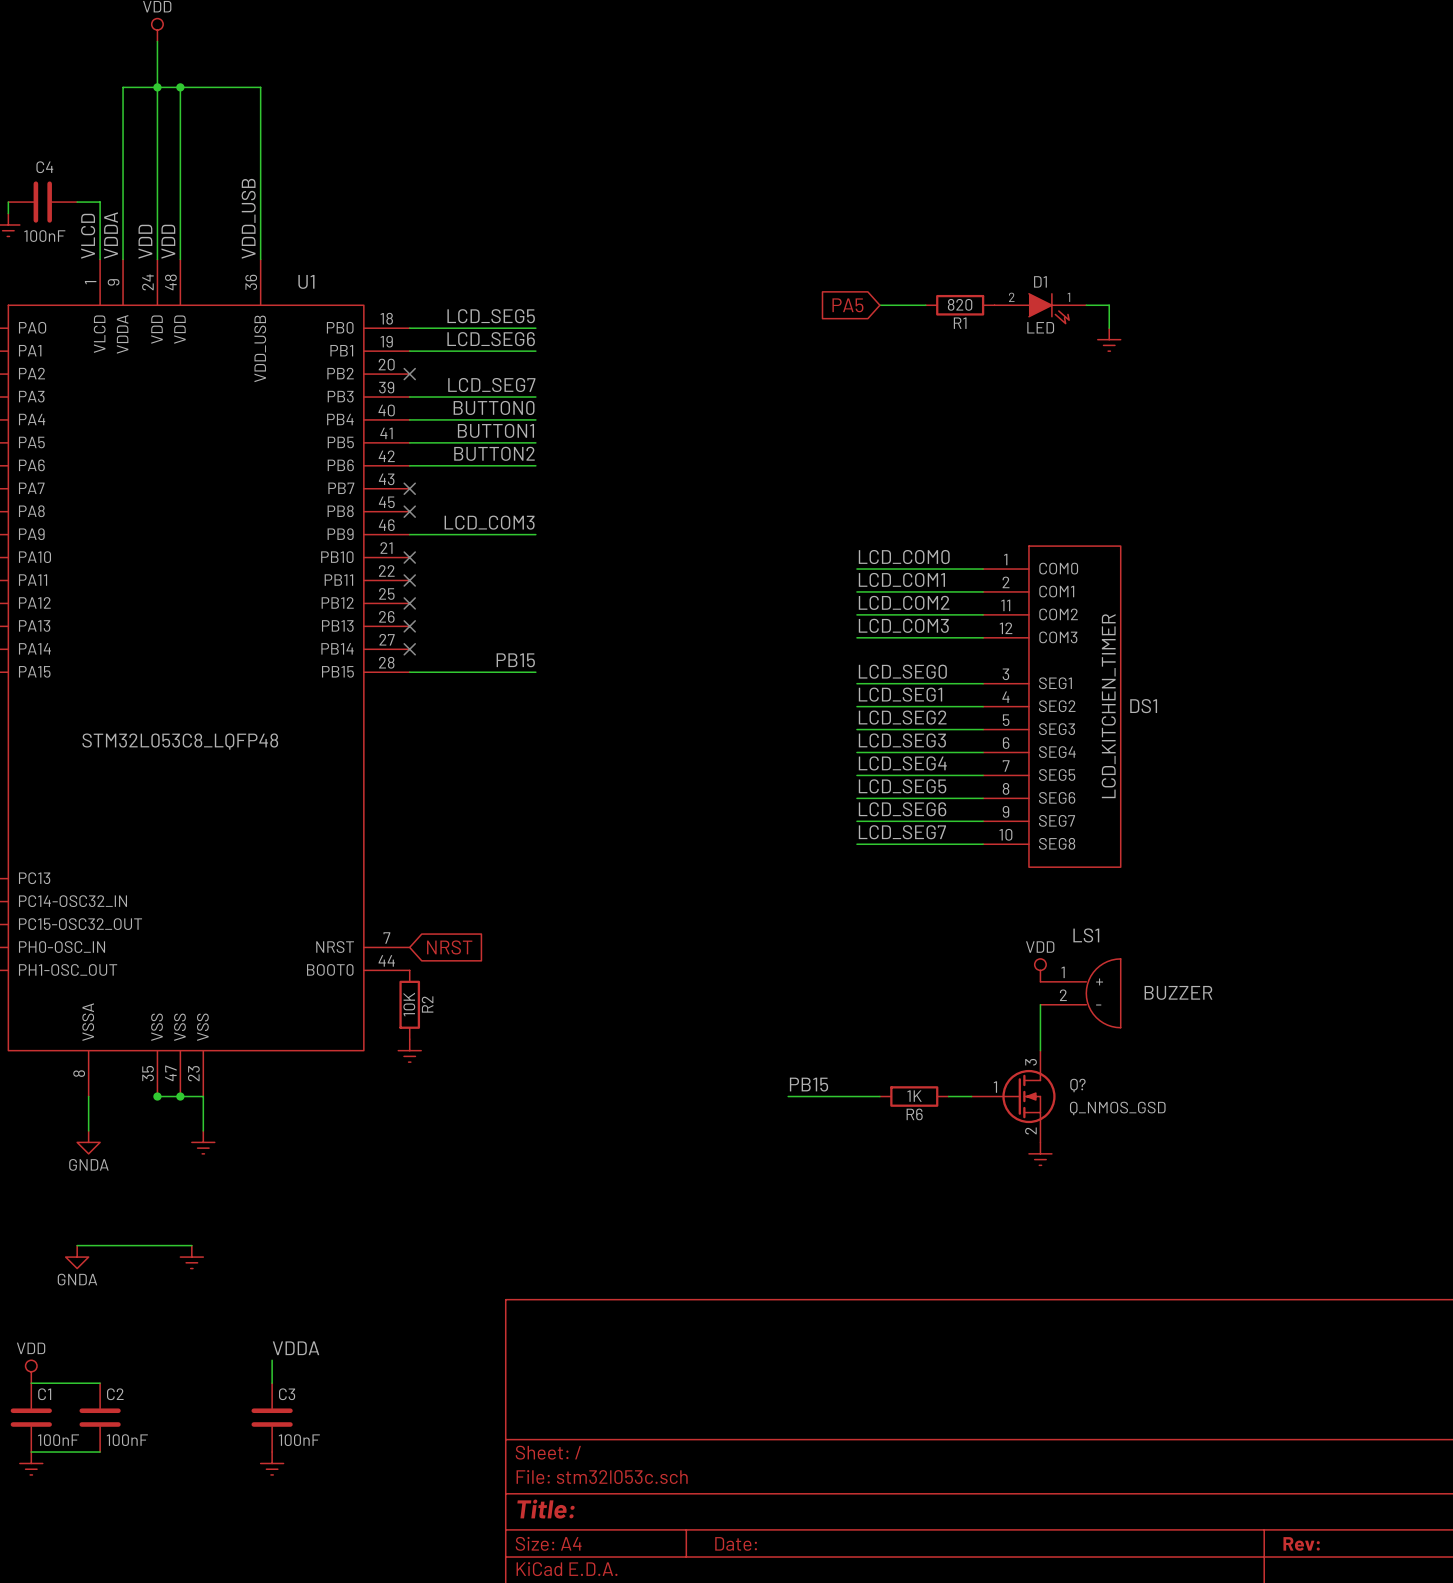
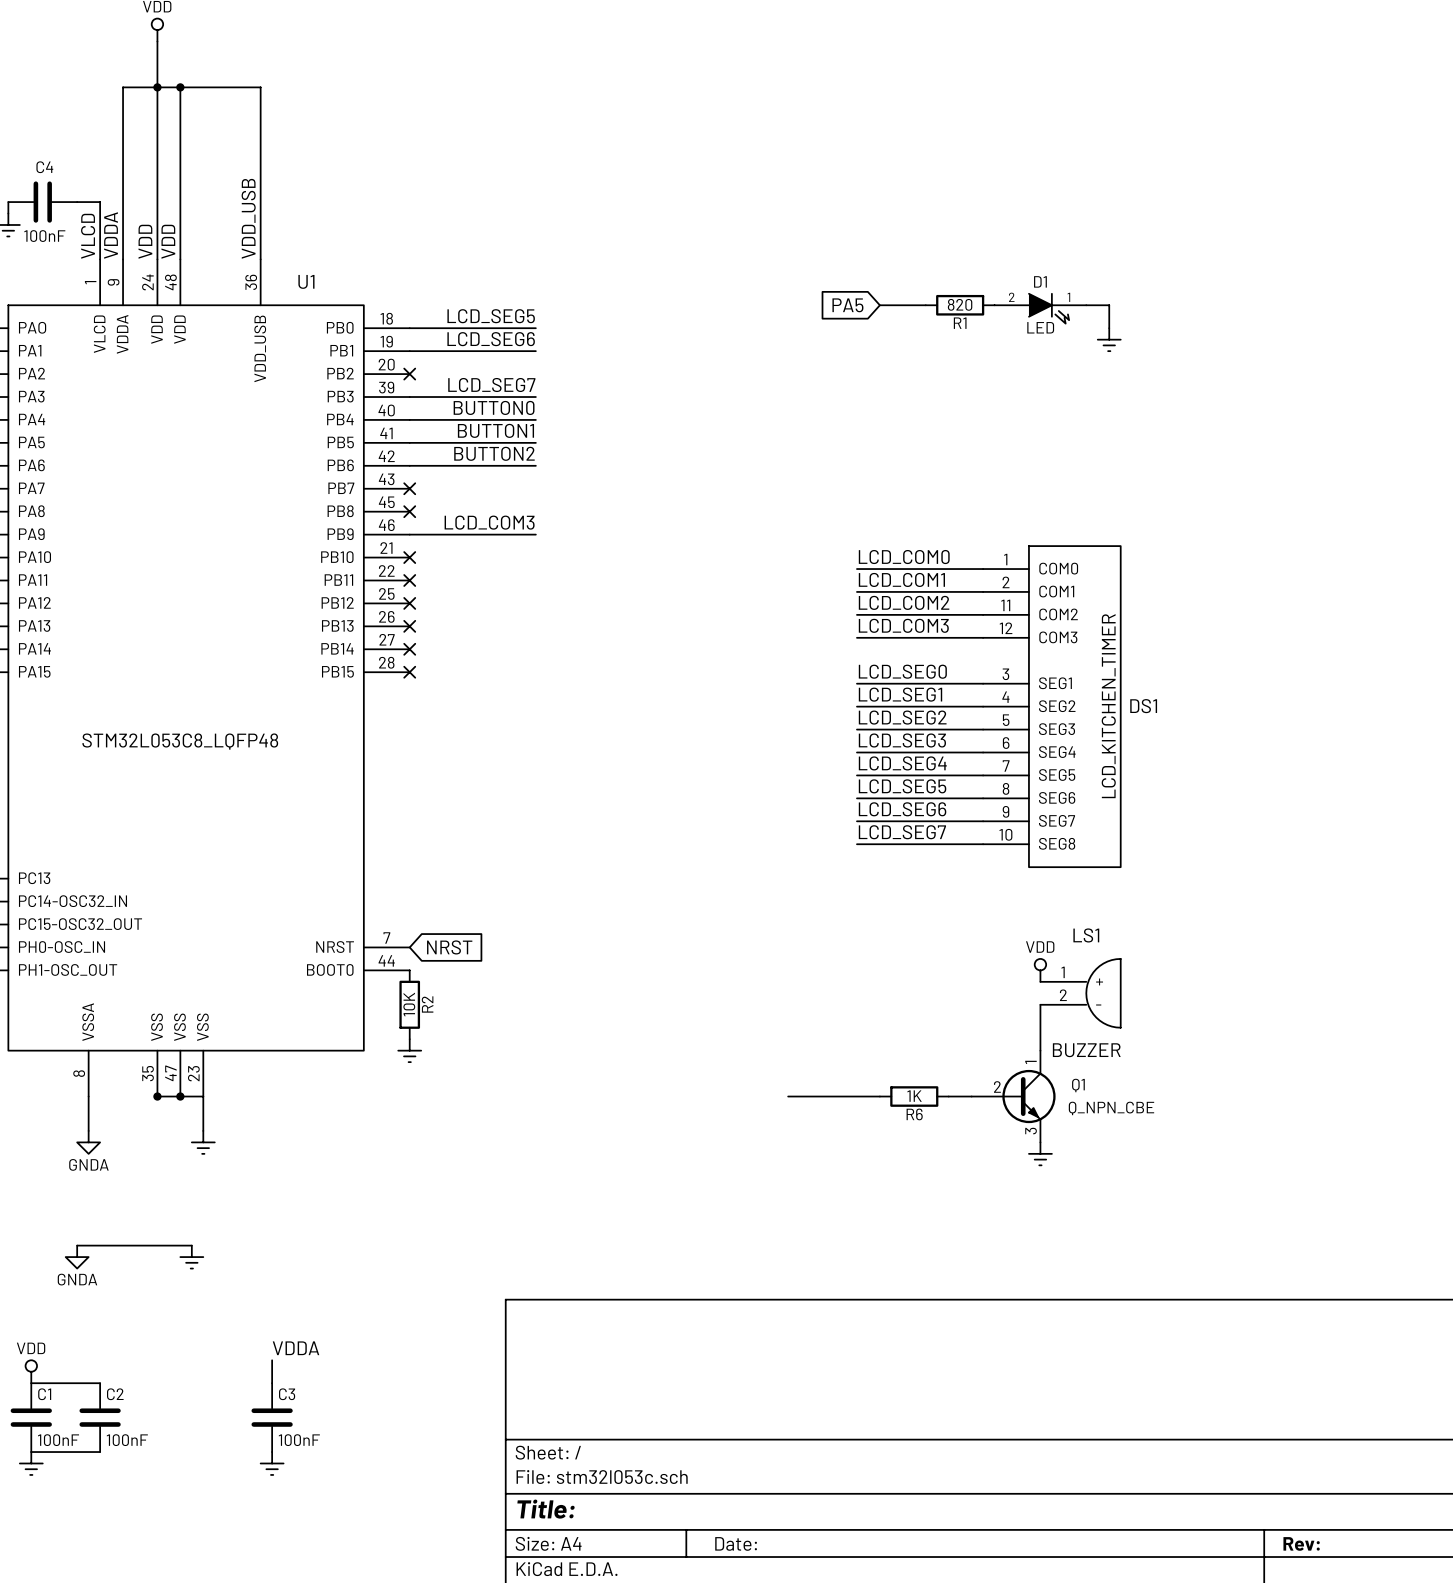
label: PB15 (515, 660) -> none
wire: (409, 672) (535, 672) -> none
no-connect mark: none -> (409, 672)
LS1 value position: BUZZER (1178, 992) -> BUZZER (1086, 1050)
label: PB15 (808, 1084) -> none
Q?: Q_NMOS_GSD (1013, 1096) -> none
Q1: none -> Q_NPN_CBE (1013, 1096)

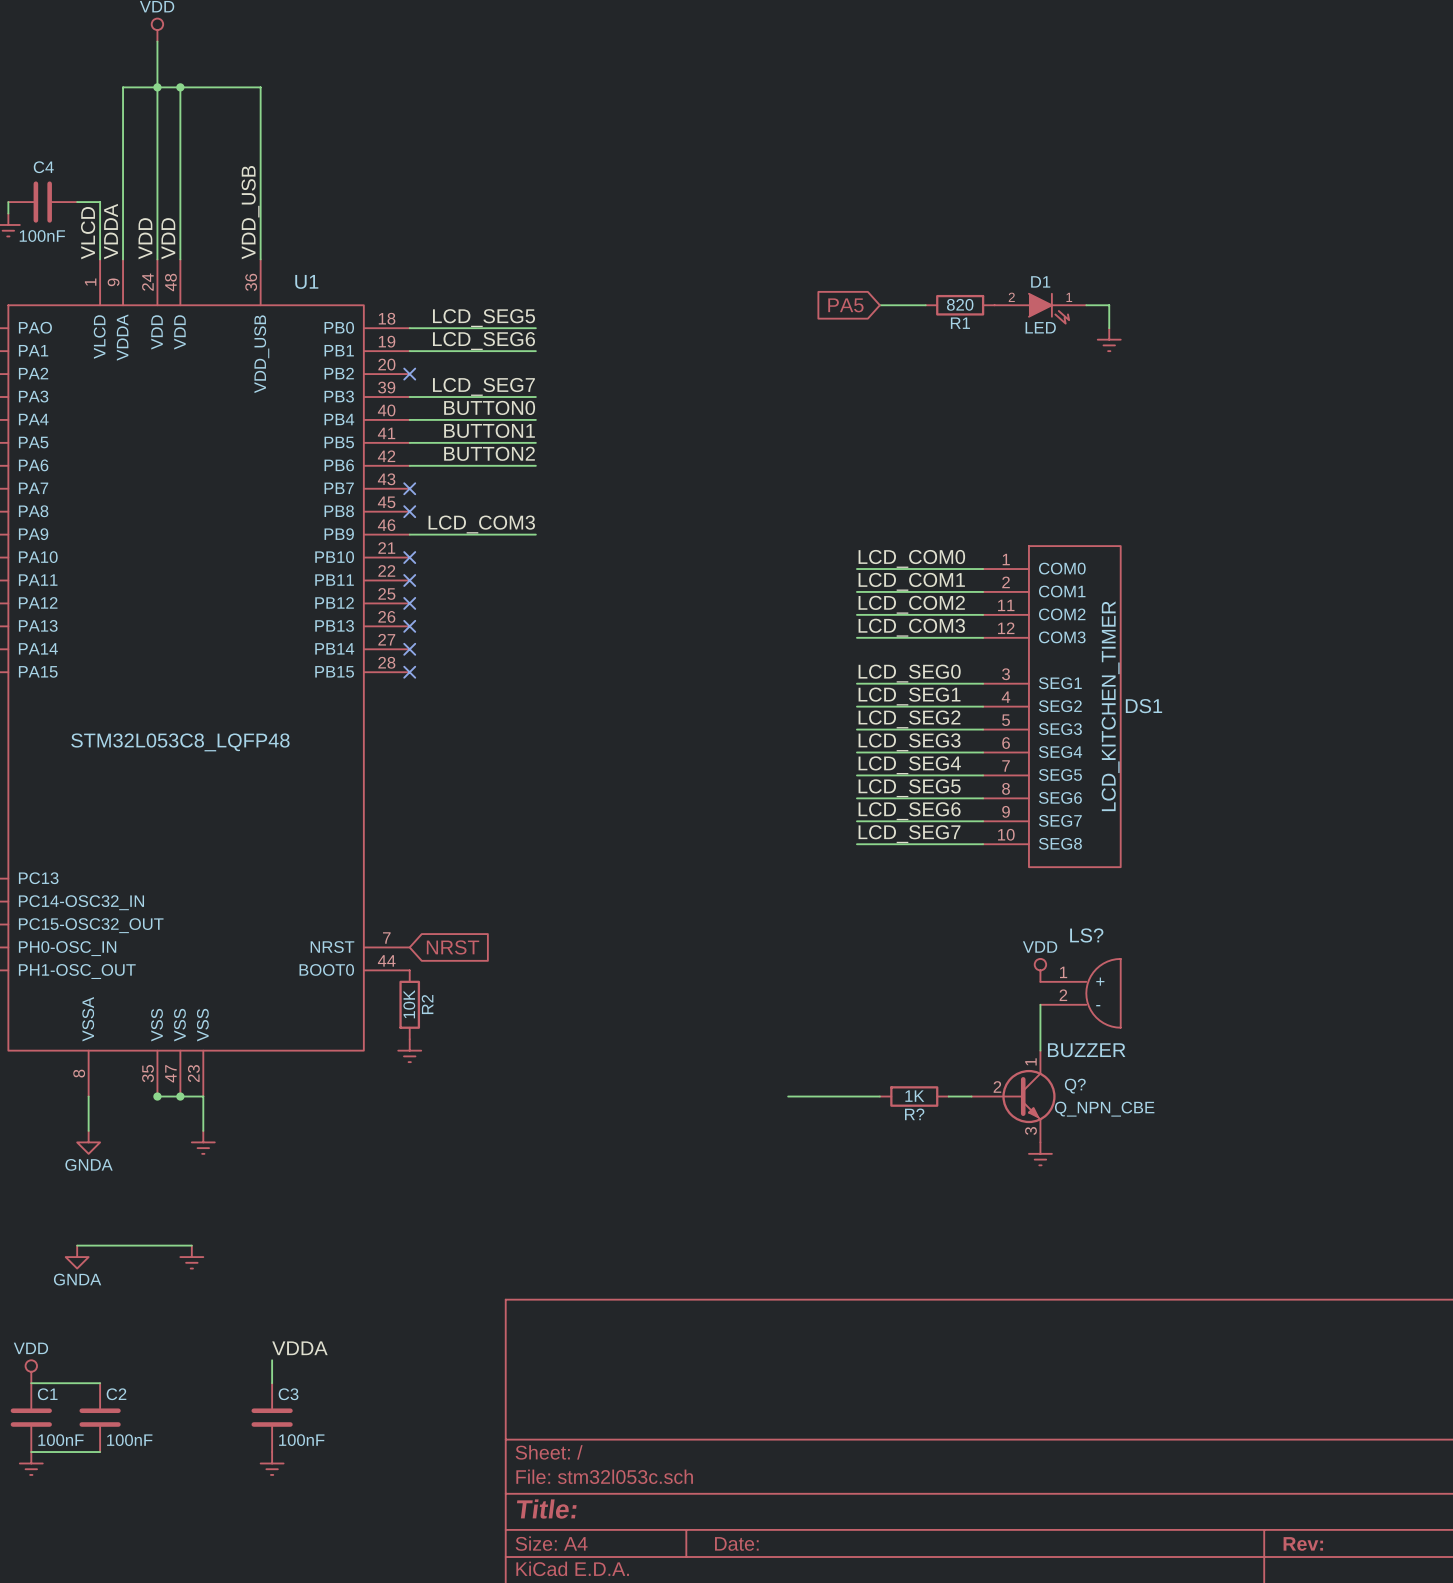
LS1 name: LS1 (1086, 935) -> LS? (1086, 935)
Q1 name: Q1 (1078, 1085) -> Q? (1075, 1086)
R6 name: R6 (914, 1114) -> R? (914, 1114)

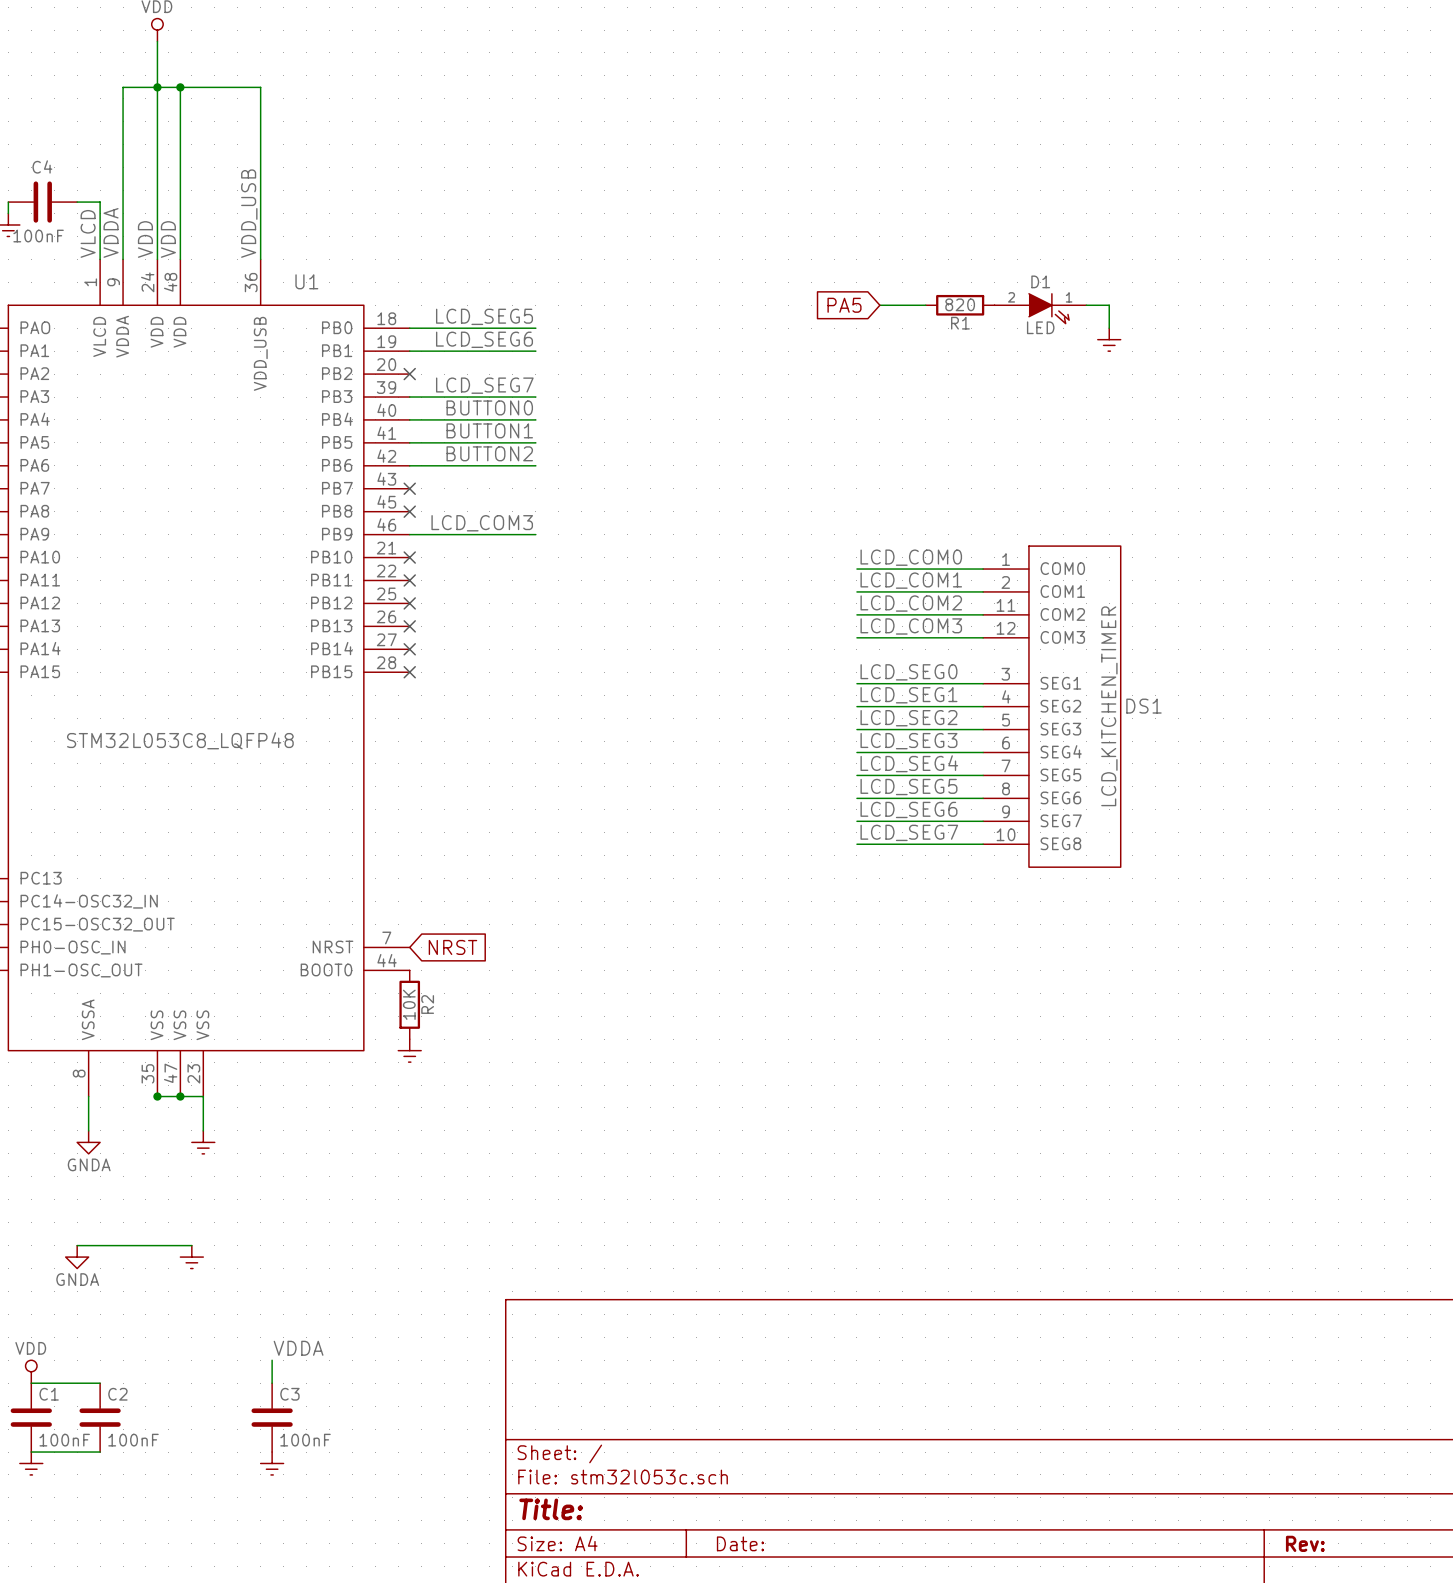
power symbol: VDD (1040, 970) -> none
LS?: BUZZER (1080, 993) -> none
wire: (1040, 1004) (1040, 1050) -> none
wire: (788, 1096) (879, 1096) -> none
R?: 1K (914, 1096) -> none
wire: (948, 1096) (971, 1096) -> none
Q?: Q_NPN_CBE (1013, 1096) -> none
power symbol: (1040, 1153) -> none

